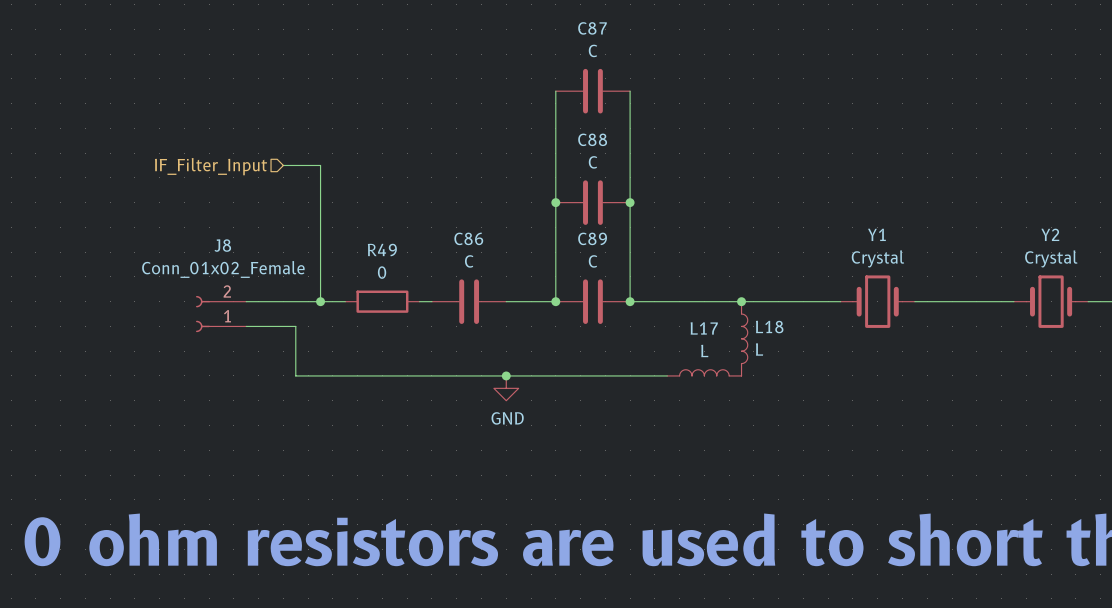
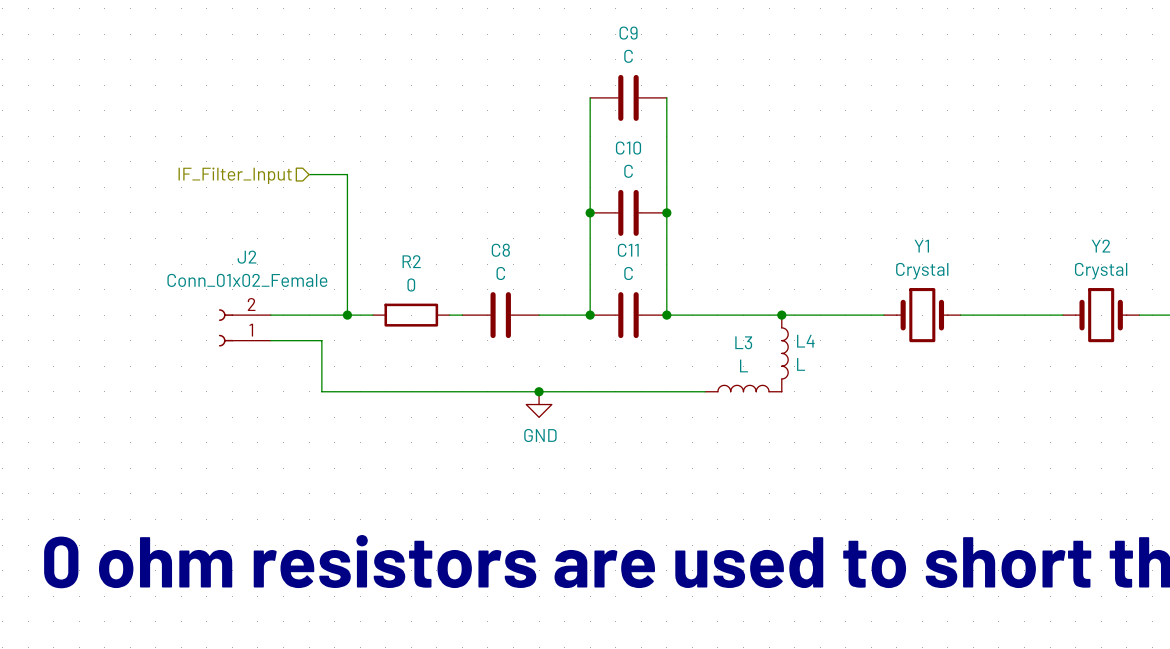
C87 name: C87 (592, 28) -> C9 (628, 33)
C88 name: C88 (592, 139) -> C10 (628, 148)
C86 name: C86 (468, 238) -> C8 (500, 250)
C89 name: C89 (592, 238) -> C11 (628, 250)
J8 name: J8 (222, 245) -> J2 (247, 257)
R49 name: R49 (382, 250) -> R2 (411, 261)
L18 name: L18 (769, 327) -> L4 (805, 341)
L17 name: L17 (704, 328) -> L3 (743, 342)

